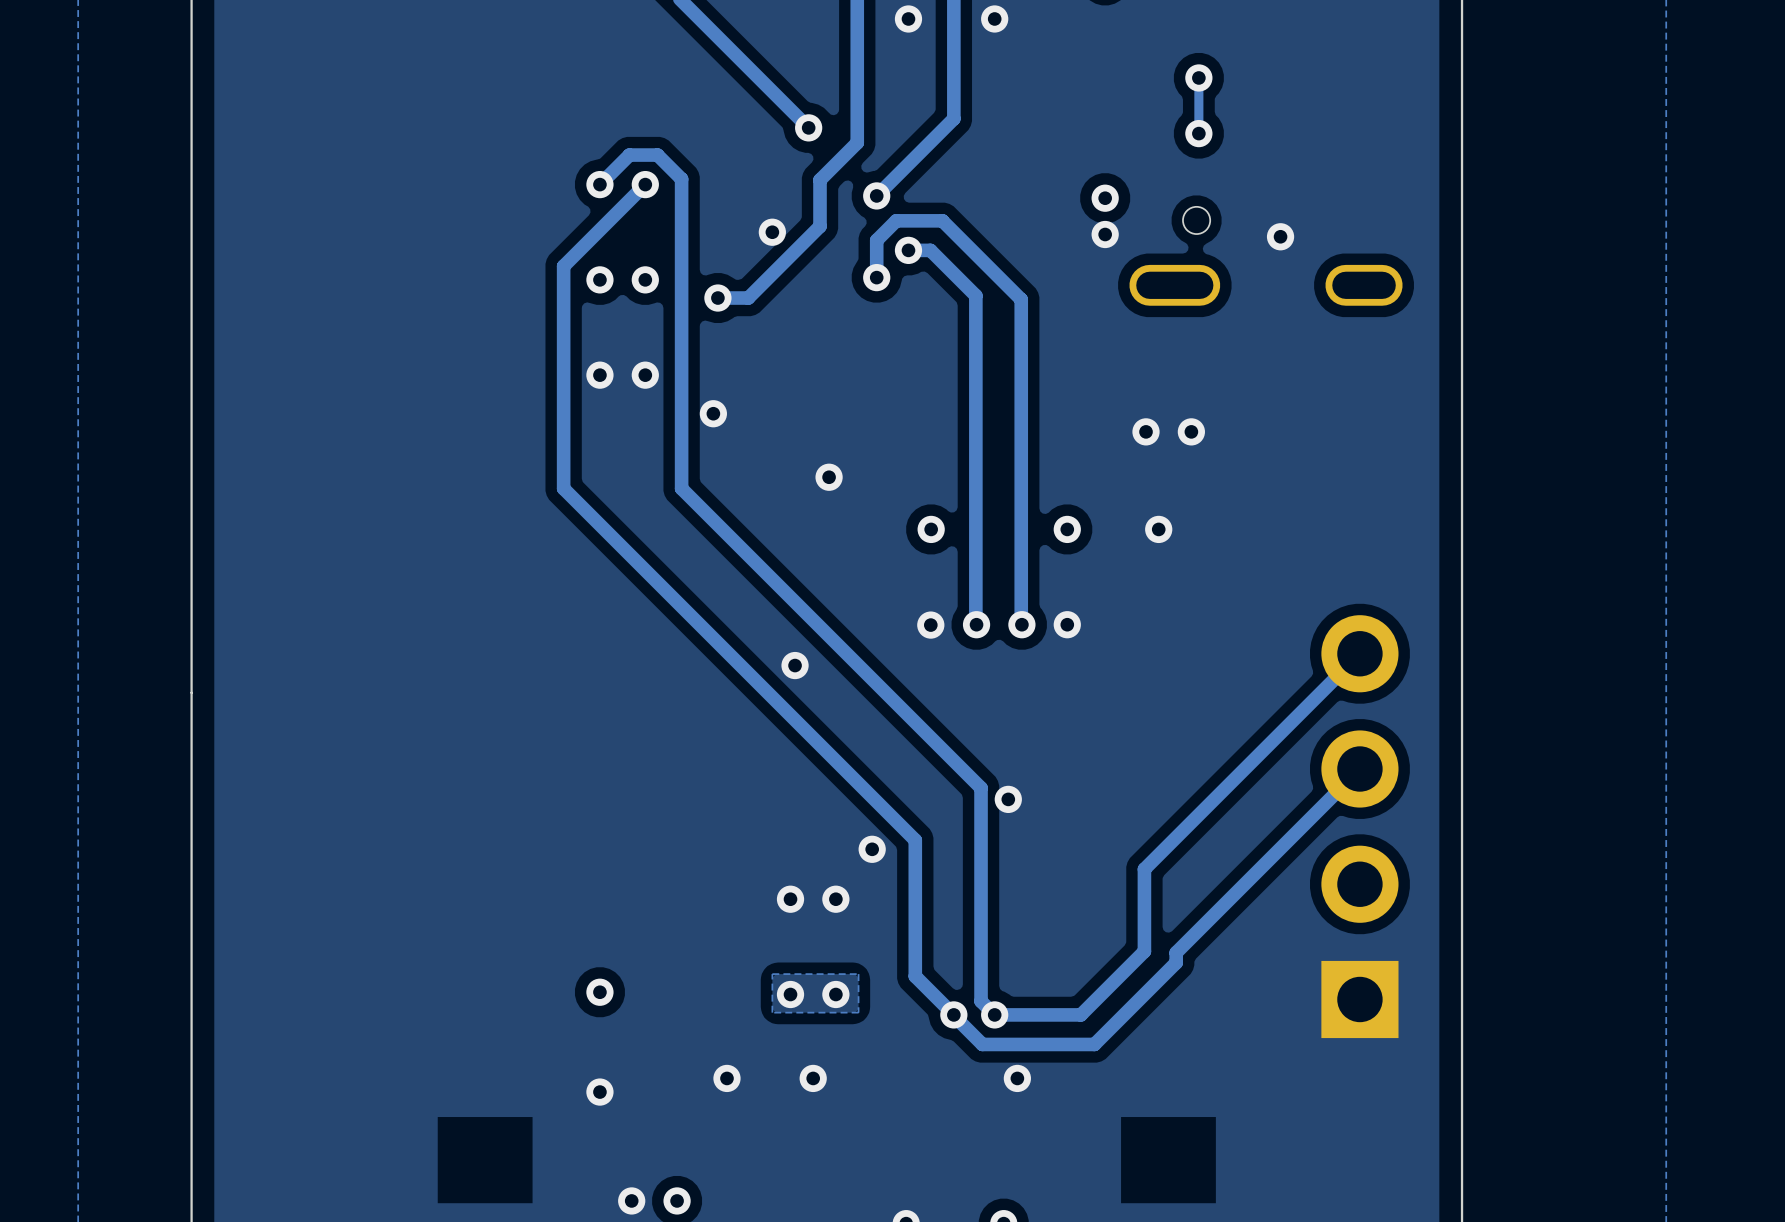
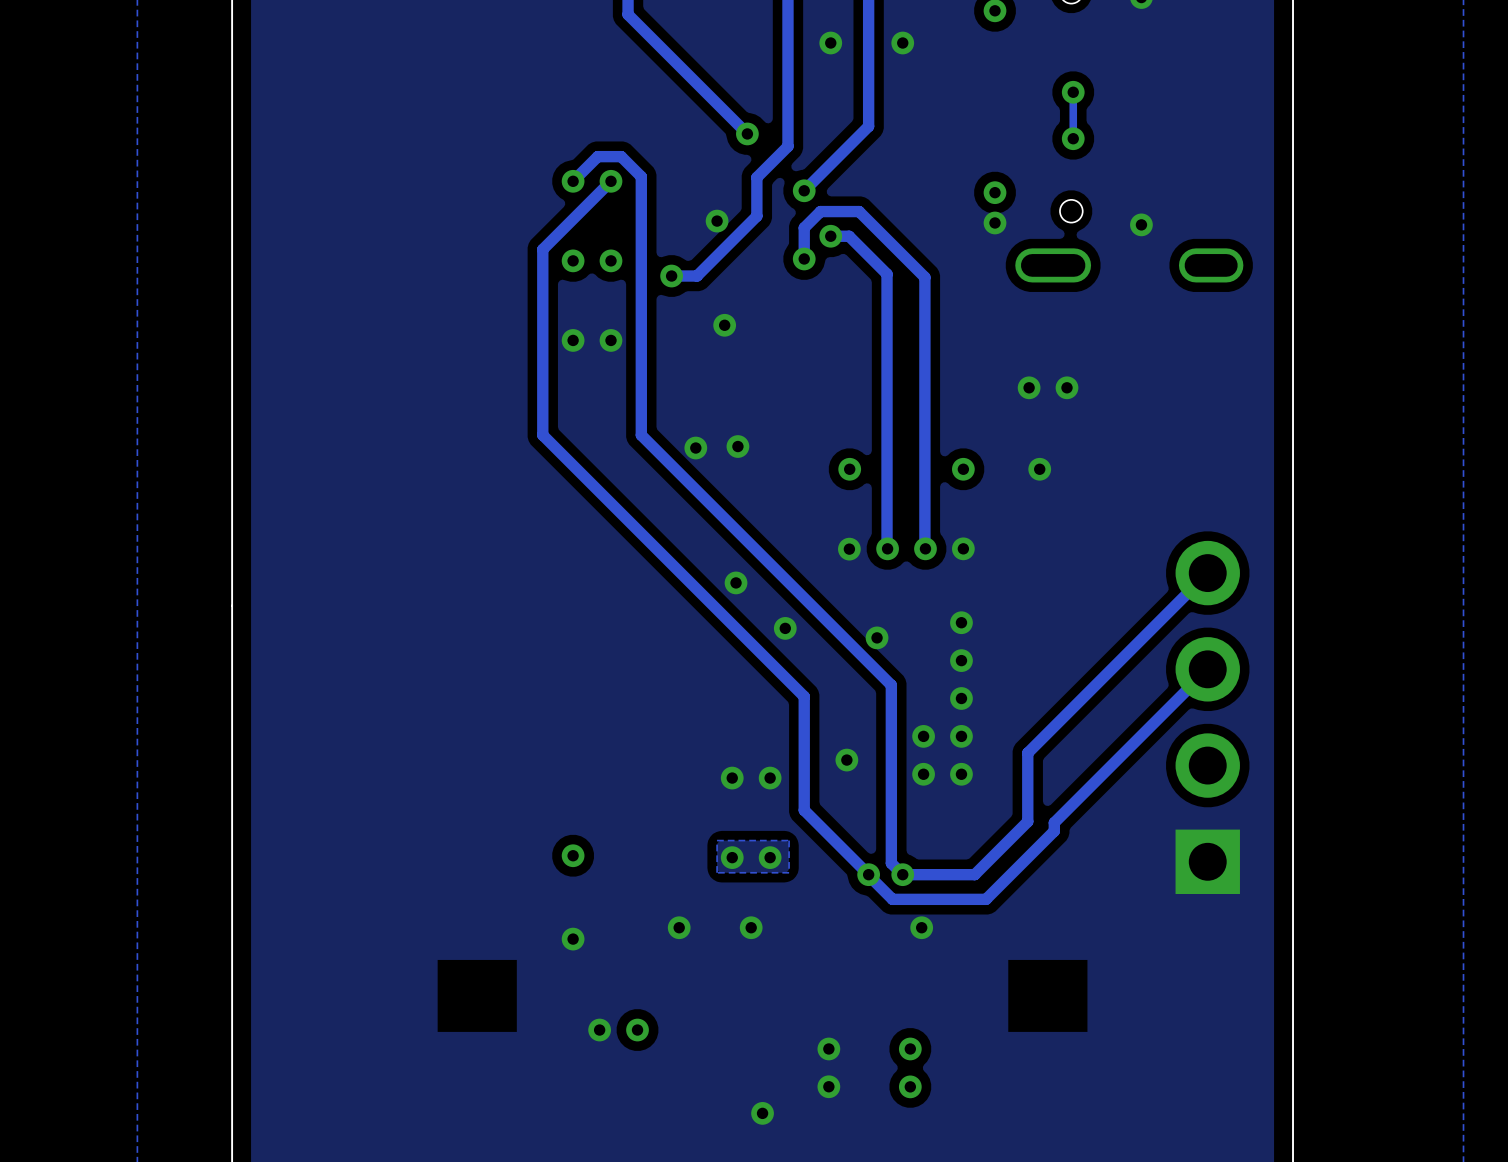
via: none -> (724, 325)
via: (713, 413) -> none
via position: (829, 477) -> (737, 446)
via: none -> (695, 448)
via: none -> (961, 622)
via: none -> (785, 628)
via: none -> (877, 637)
via: none -> (961, 660)
via: (1008, 799) -> none
track: (876, 801) (915, 840) (915, 976) -> (804, 696) (804, 810) (836, 842)
via: none -> (961, 698)
via: (872, 849) -> none
via: none -> (923, 736)
via: none -> (961, 736)
via: none -> (846, 760)
via: none -> (923, 774)
via: none -> (961, 774)

